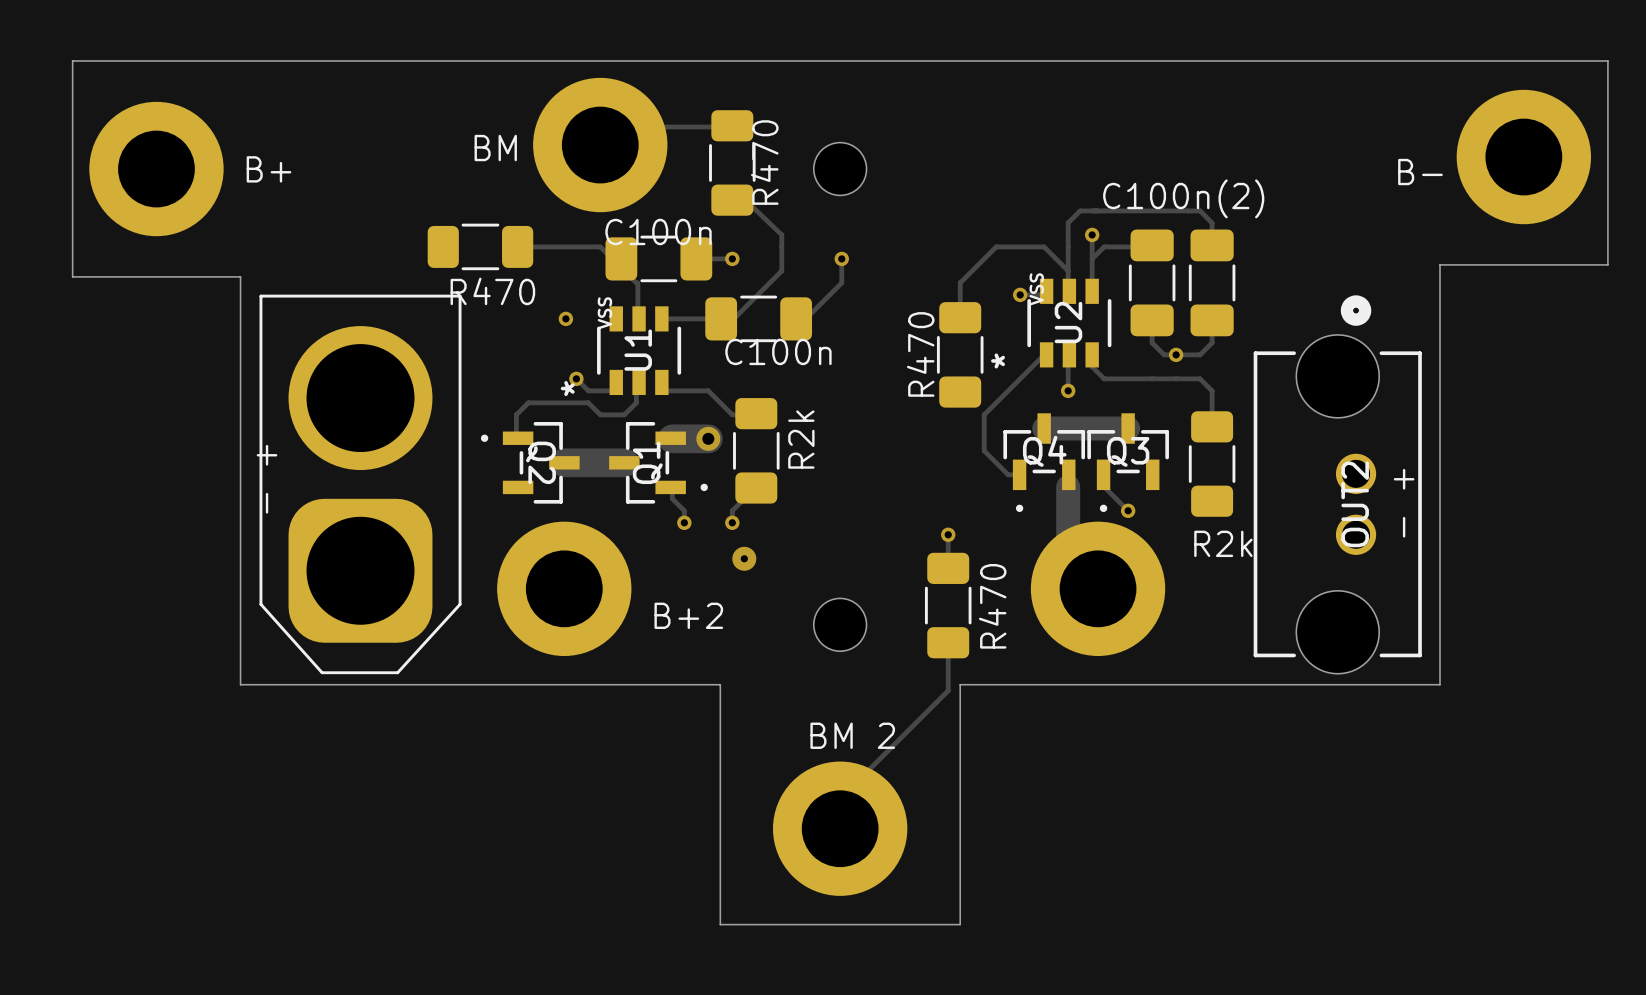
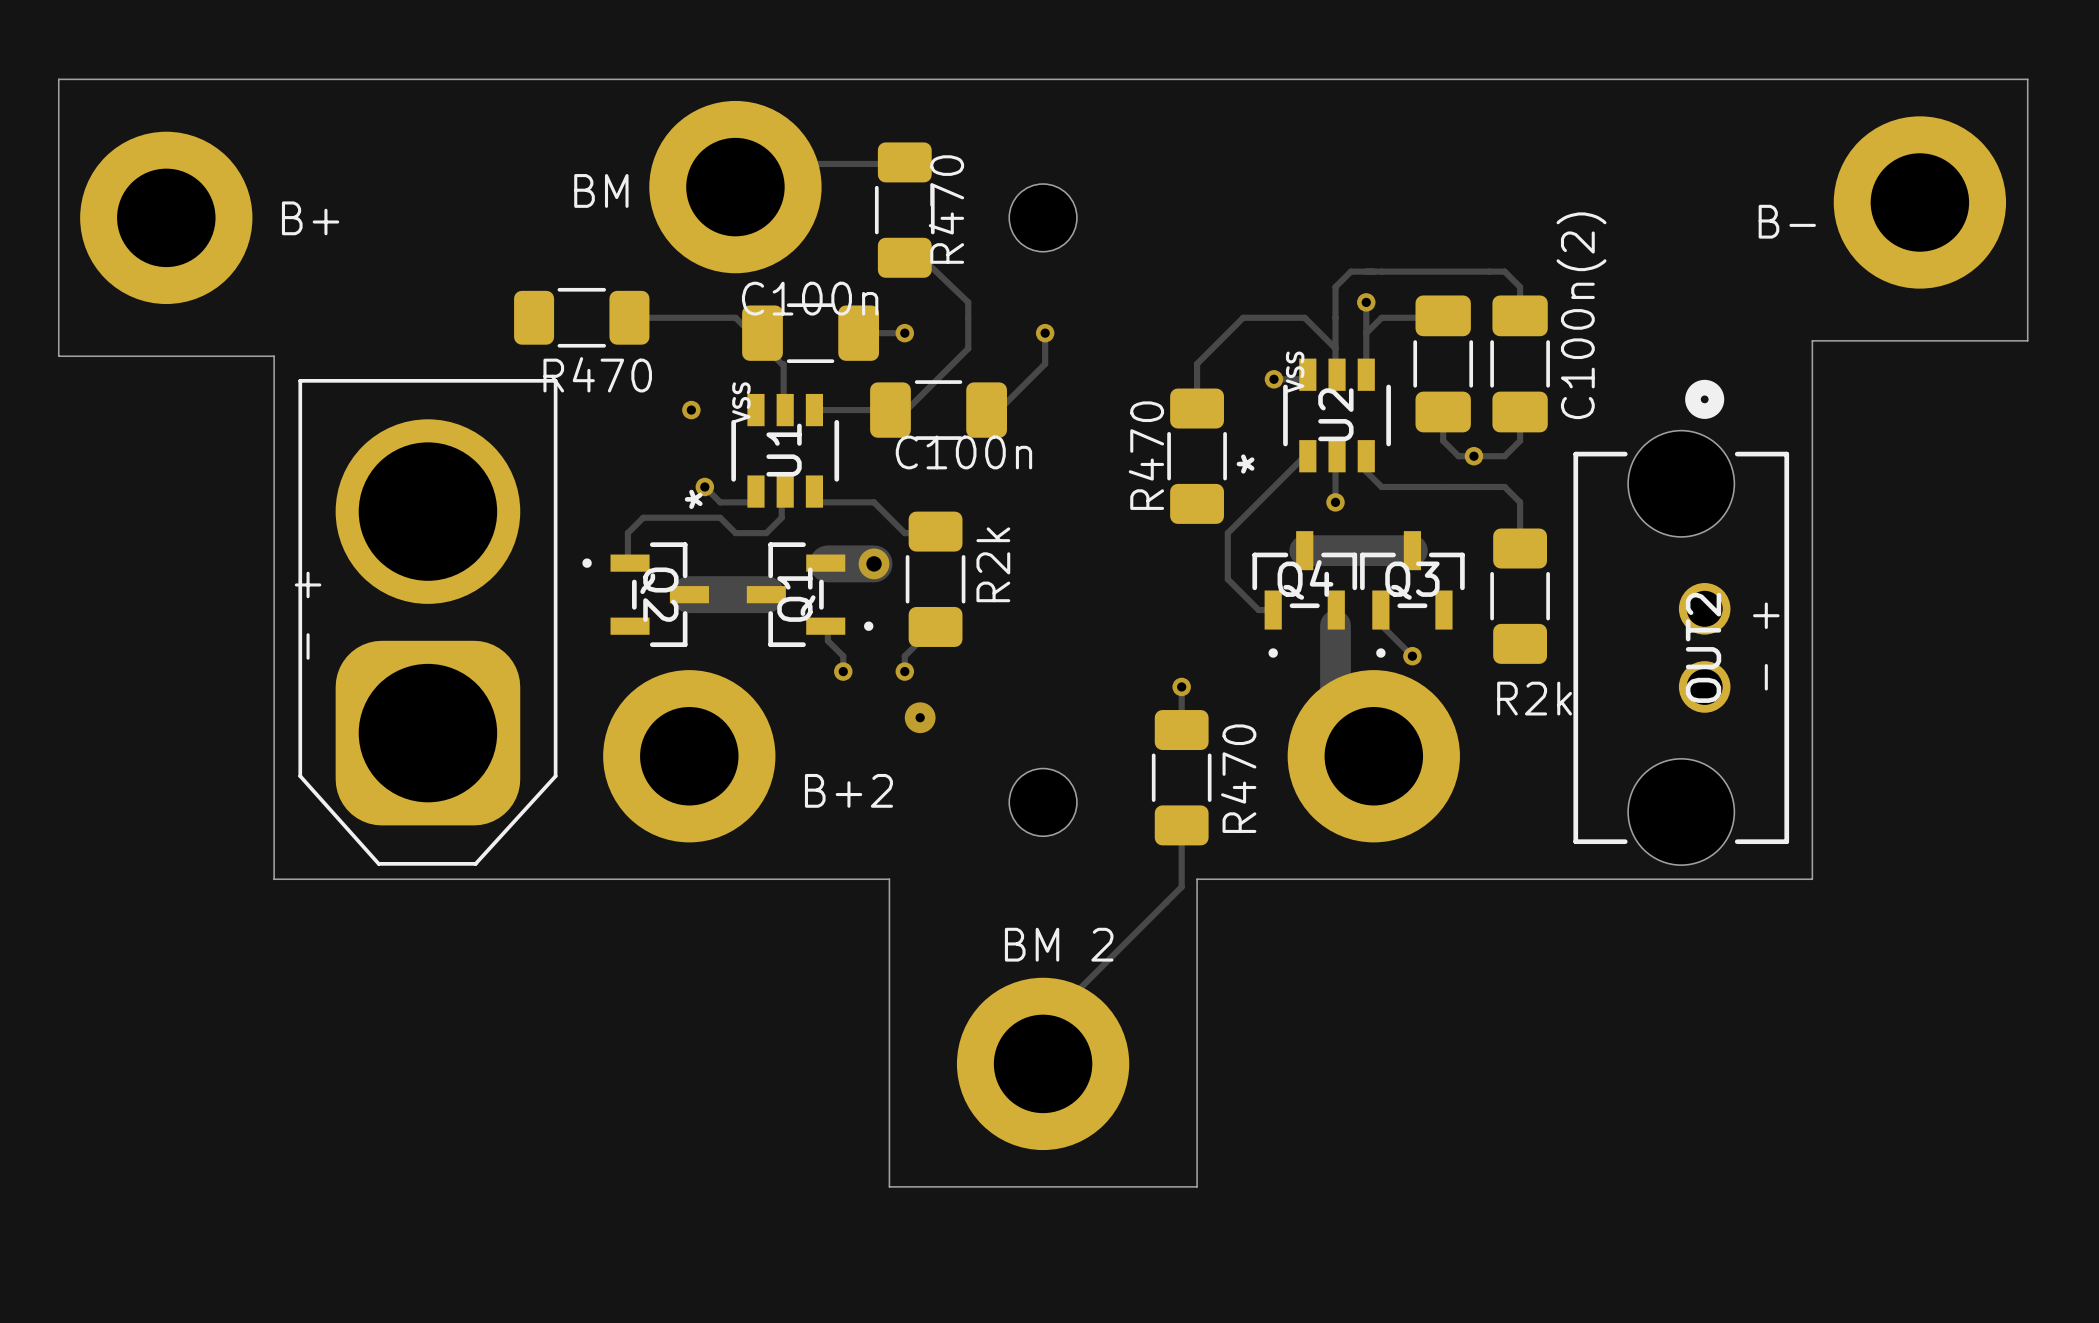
text rotation: 0° (1183, 198) -> 90° counterclockwise (1581, 315)

